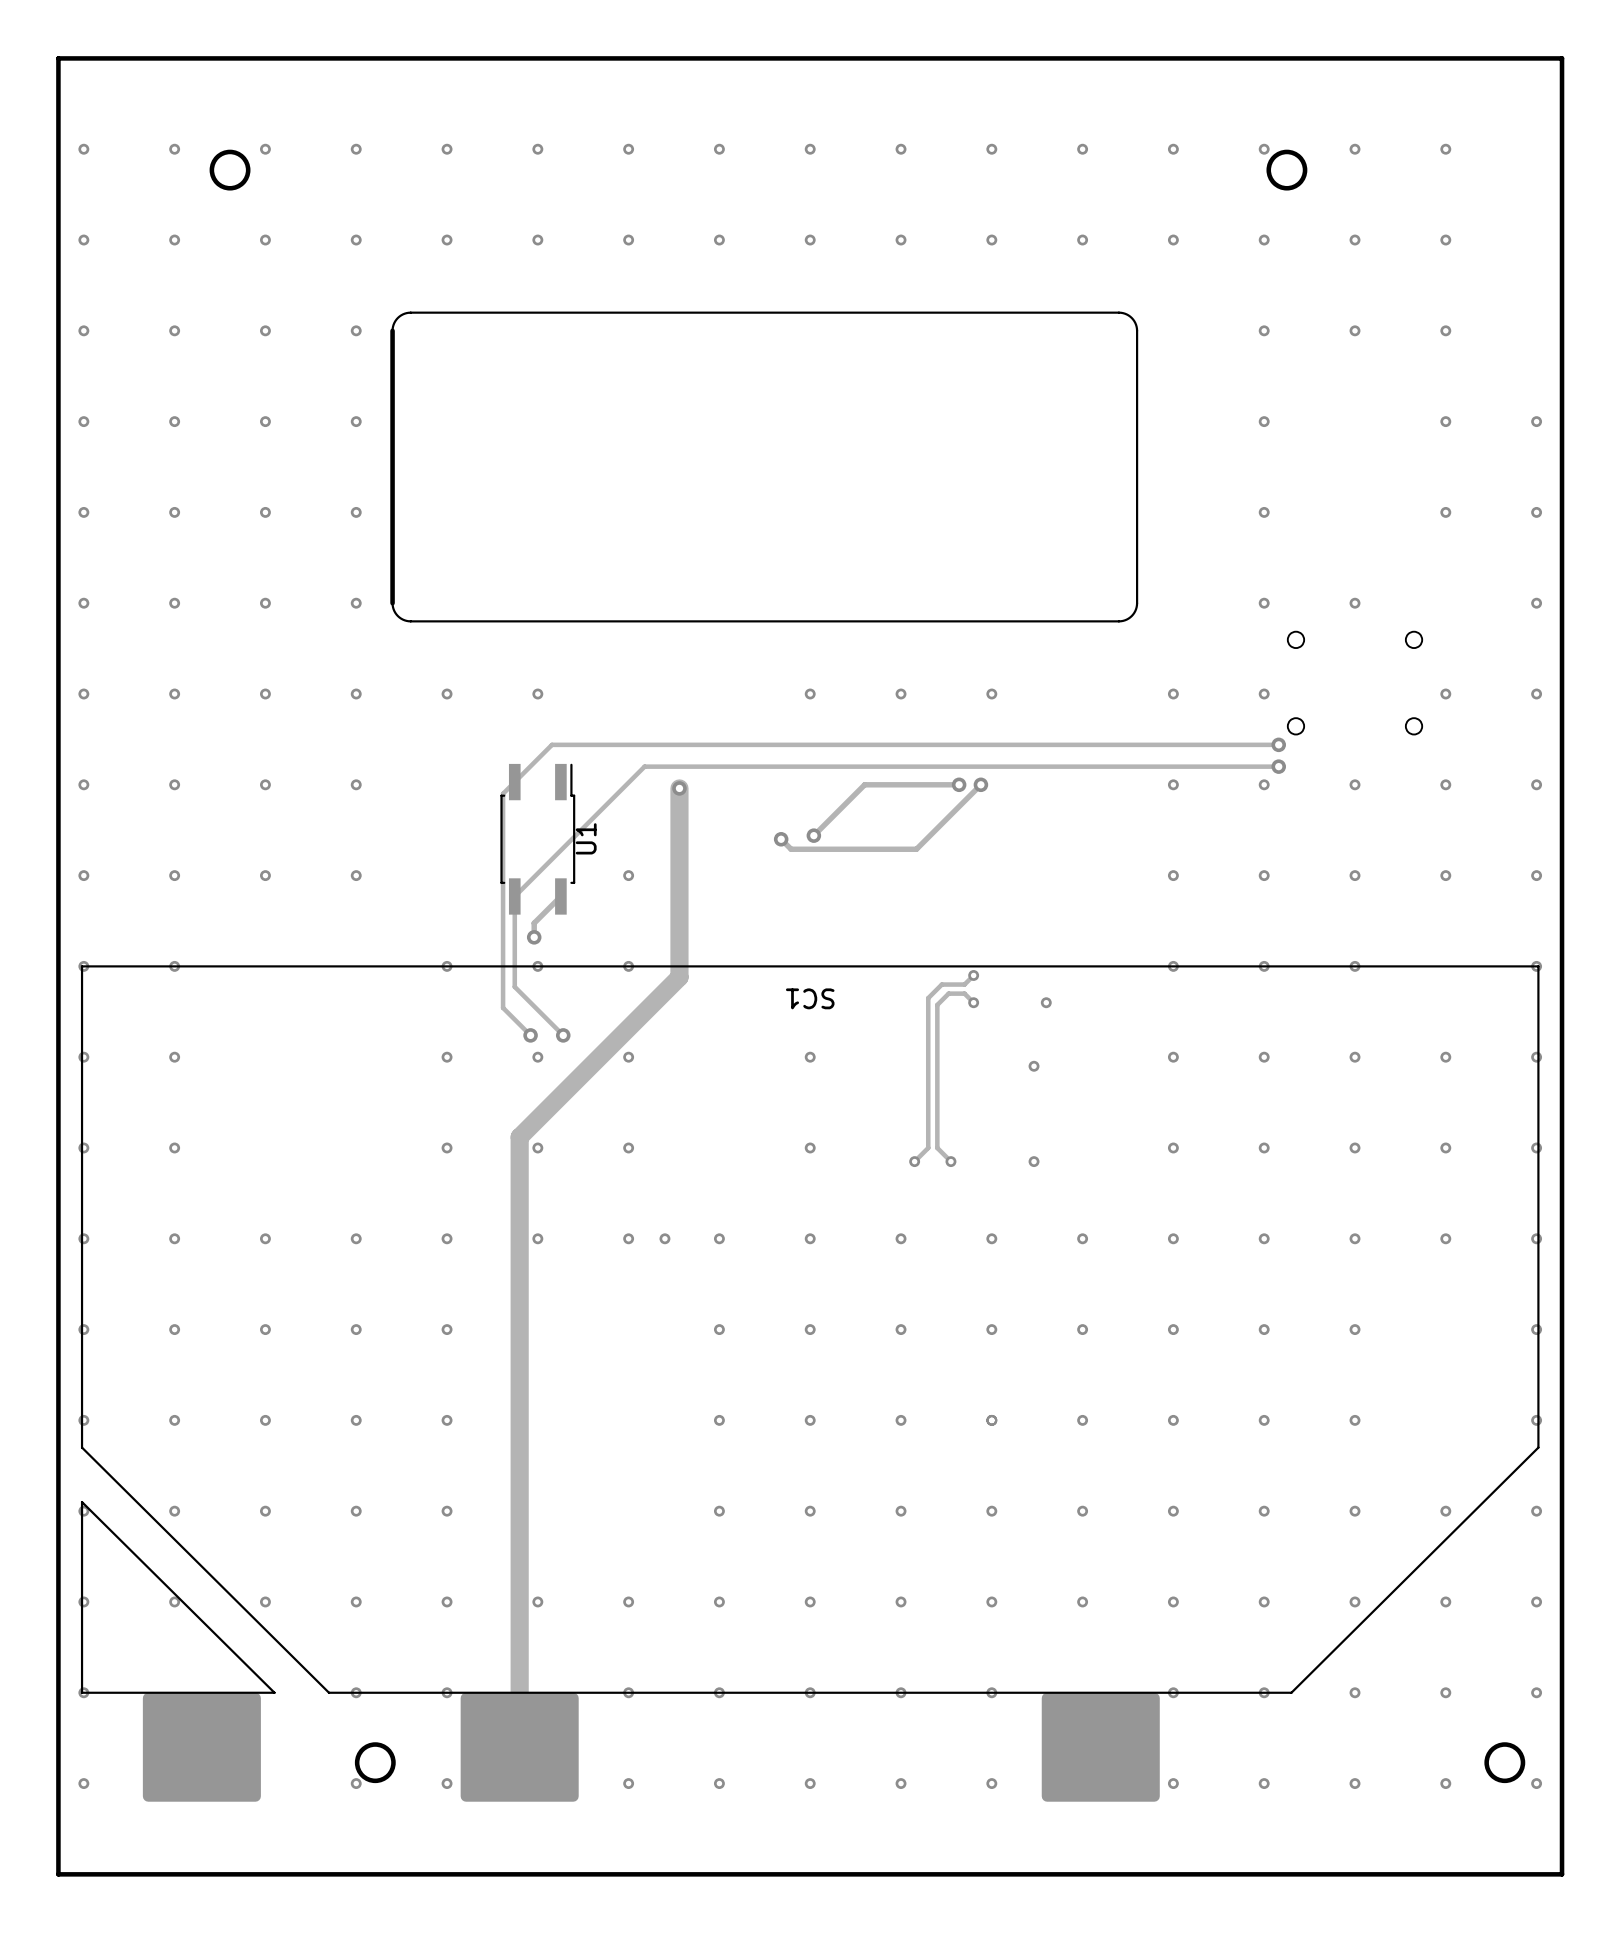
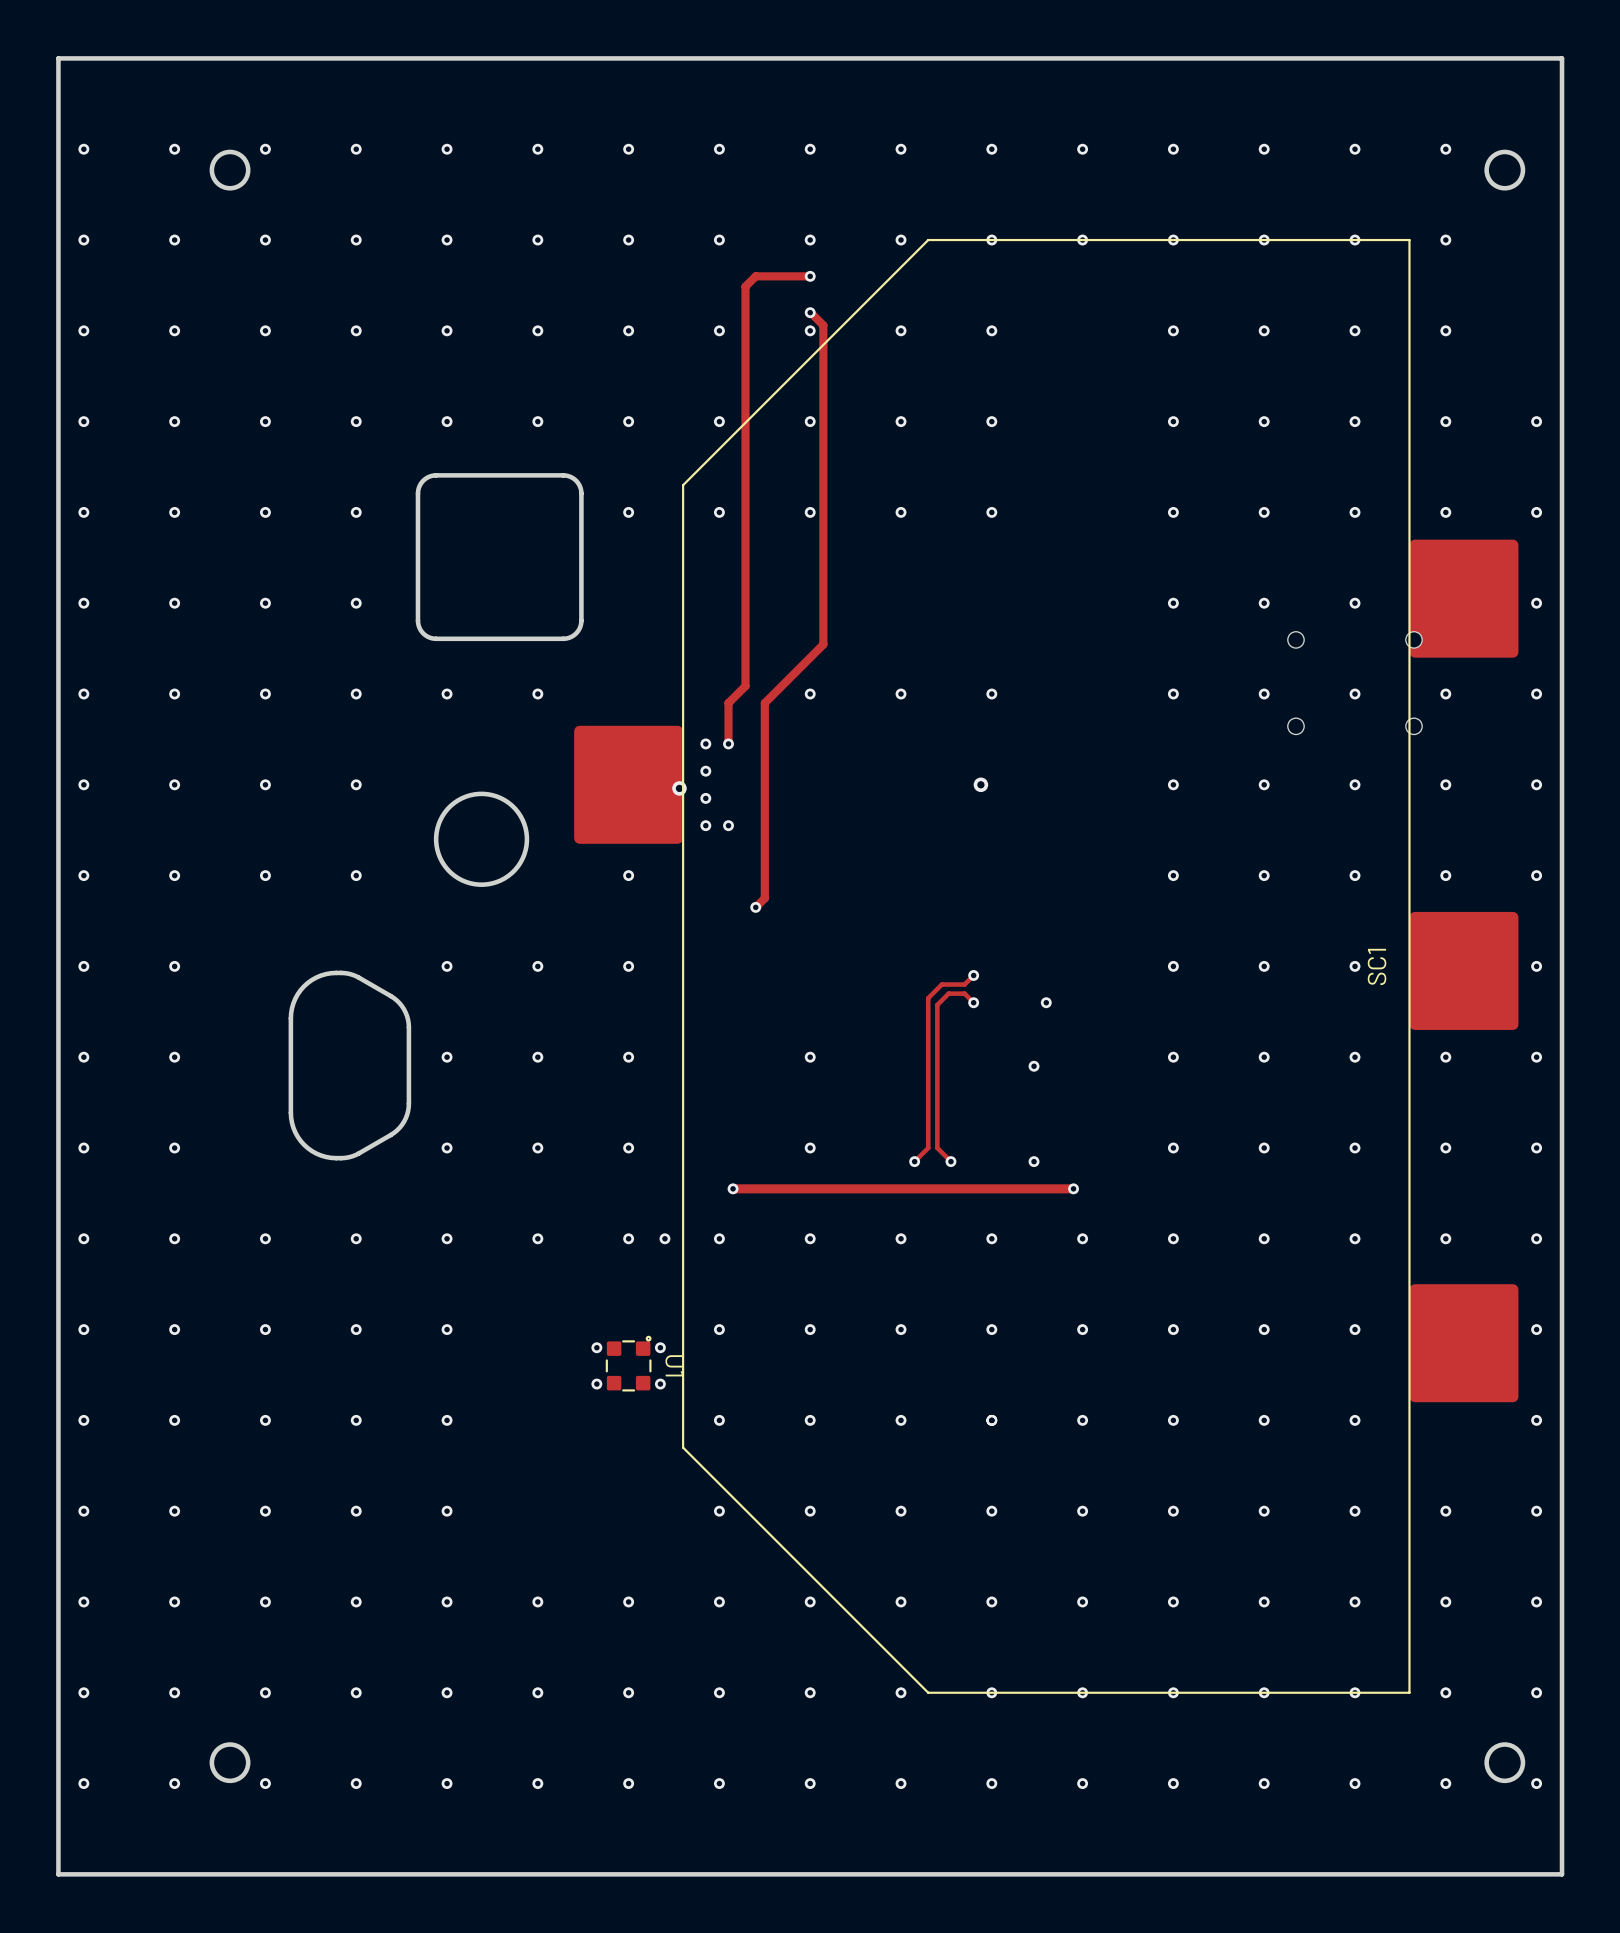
drawing shape: [56, 56, 1565, 1877] -> [56, 56, 1565, 1877]
track: none -> (810, 276) (755, 276) (745, 286) (745, 686) (728, 703) (728, 743)
via: none -> (810, 276)
track: none -> (810, 312) (823, 325) (823, 644) (764, 703) (764, 898) (755, 907)
via: none -> (810, 312)
via: none -> (447, 330)
via: none -> (537, 330)
via: none -> (628, 330)
via: none -> (719, 330)
via: none -> (810, 330)
via: none -> (901, 330)
via: none -> (991, 330)
via: none -> (1173, 330)
via: none -> (447, 421)
via: none -> (537, 421)
via: none -> (628, 421)
via: none -> (719, 421)
via: none -> (810, 421)
via: none -> (901, 421)
via: none -> (991, 421)
via: none -> (1173, 421)
via: none -> (1355, 421)
via: none -> (628, 512)
via: none -> (719, 512)
via: none -> (810, 512)
via: none -> (901, 512)
via: none -> (991, 512)
via: none -> (1173, 512)
via: none -> (1355, 512)
via: none -> (1173, 603)
via: none -> (1355, 694)
via: none -> (705, 743)
via: none -> (728, 743)
track: (1278, 744) (552, 744) (503, 793) (503, 1007) (530, 1035) -> none
via: (1278, 744) -> none
U1 footprint: [500, 763, 576, 915] -> [605, 1335, 652, 1392]
track: (1278, 766) (644, 766) (514, 896) (514, 986) (563, 1035) -> none
via: (1278, 766) -> none
via: none -> (705, 771)
track: (959, 784) (864, 784) (813, 835) -> none
via: (959, 784) -> none
track: (980, 784) (916, 849) (791, 849) (781, 839) -> none
track: (679, 788) (679, 977) (519, 1137) (519, 1747) -> none
via: none -> (705, 798)
via: none -> (705, 825)
via: none -> (728, 825)
via: (813, 835) -> none
via: (781, 839) -> none
track: (560, 896) (534, 923) (534, 937) -> none
via: none -> (755, 907)
via: (534, 937) -> none
SC1 footprint: [80, 965, 1540, 1802] -> [574, 238, 1519, 1694]
SC1 name position: SC1 (810, 998) -> SC1 (1377, 966)
via: (530, 1035) -> none
via: (563, 1035) -> none
track: none -> (733, 1188) (1073, 1188)
via: none -> (733, 1188)
via: none -> (1073, 1188)
via: none -> (596, 1347)
via: none -> (660, 1347)
via: none -> (596, 1384)
via: none -> (660, 1384)
via: none -> (174, 1692)
via: none -> (265, 1692)
via: none -> (537, 1692)
via: none -> (1082, 1692)
via: none -> (174, 1783)
via: none -> (265, 1783)
via: none -> (537, 1783)
via: none -> (1082, 1783)

